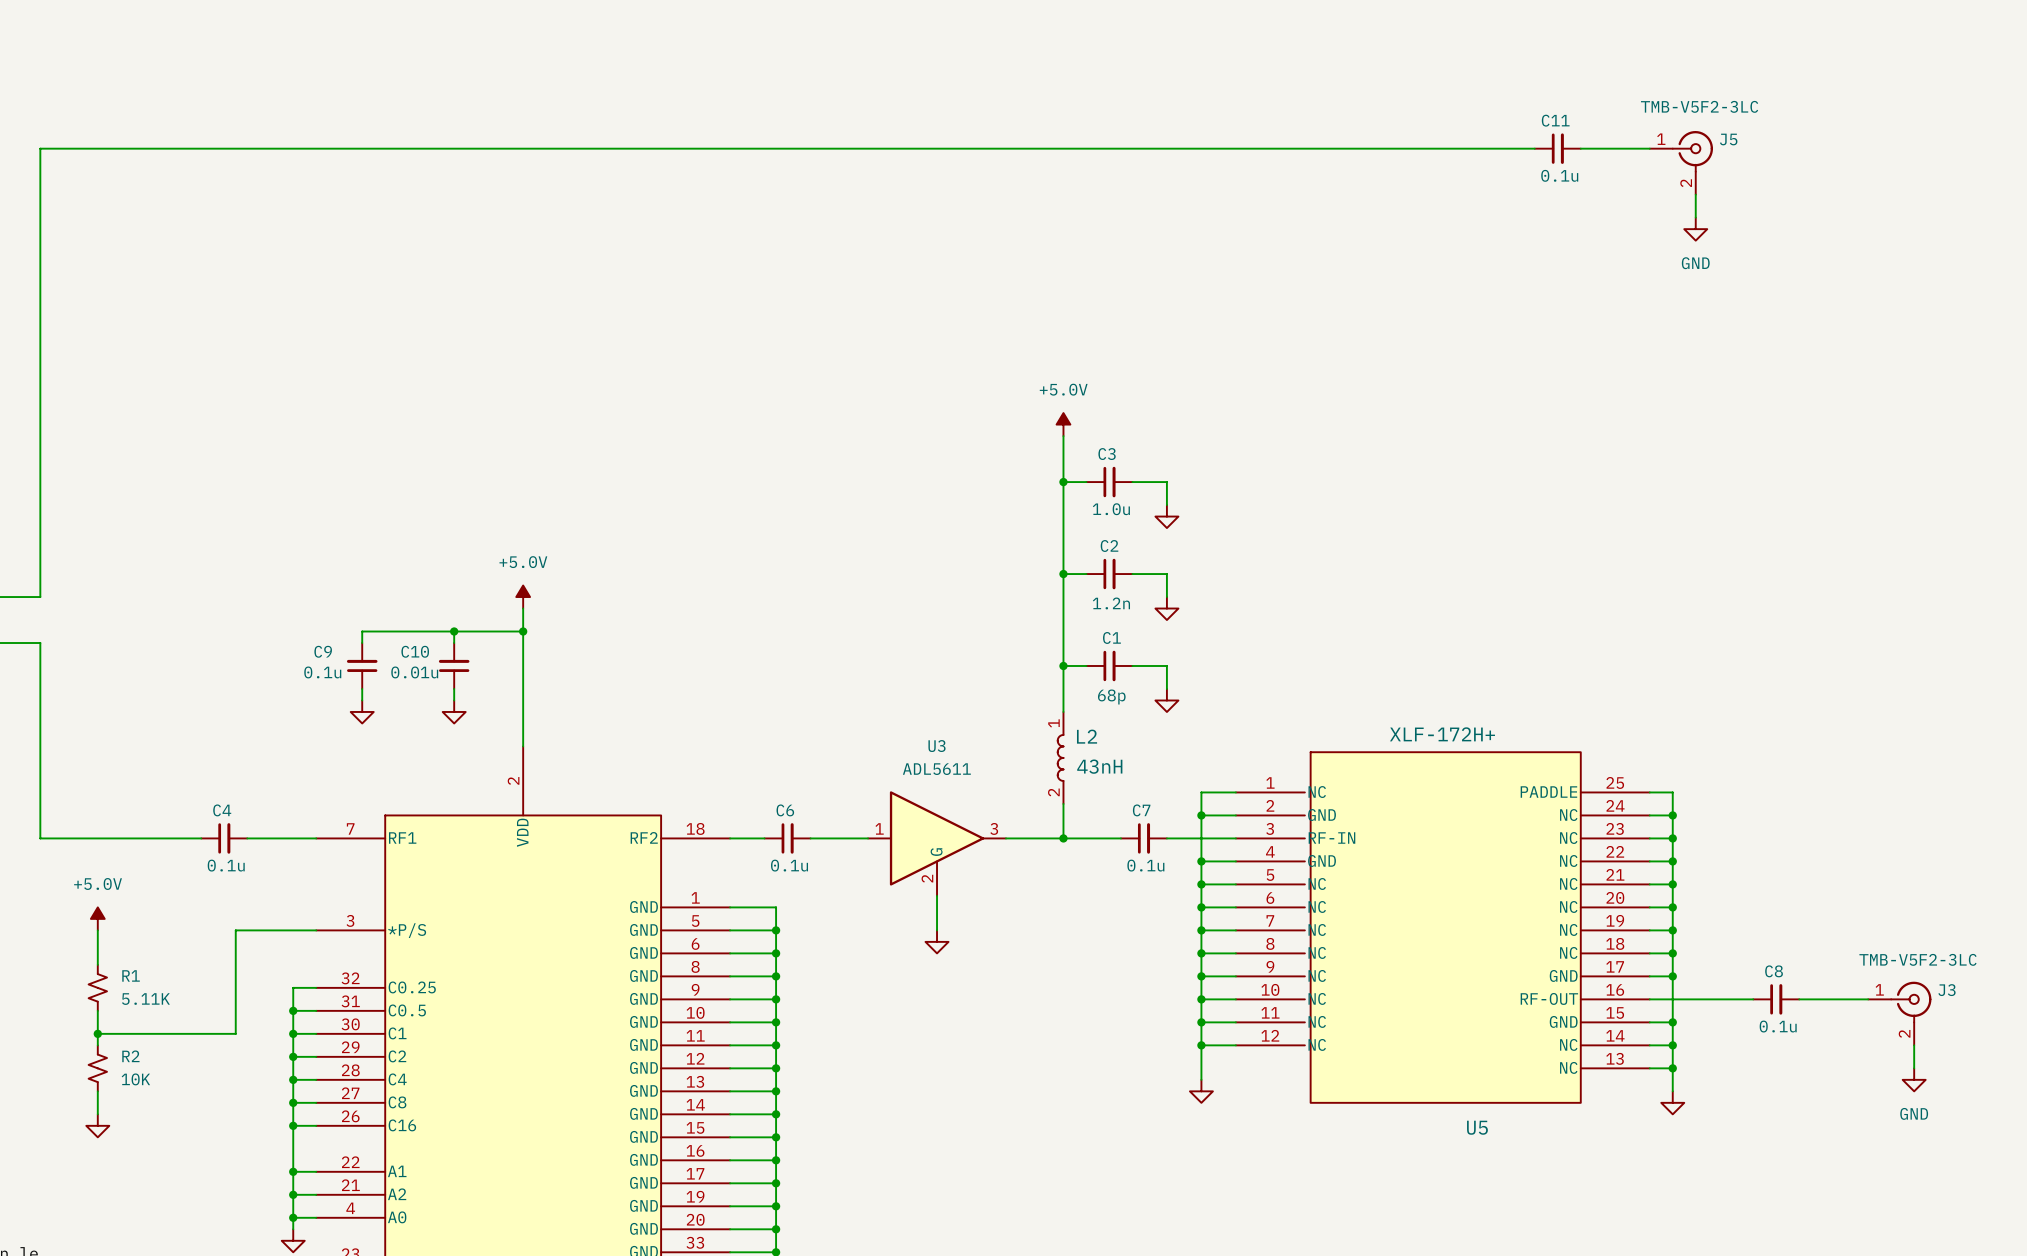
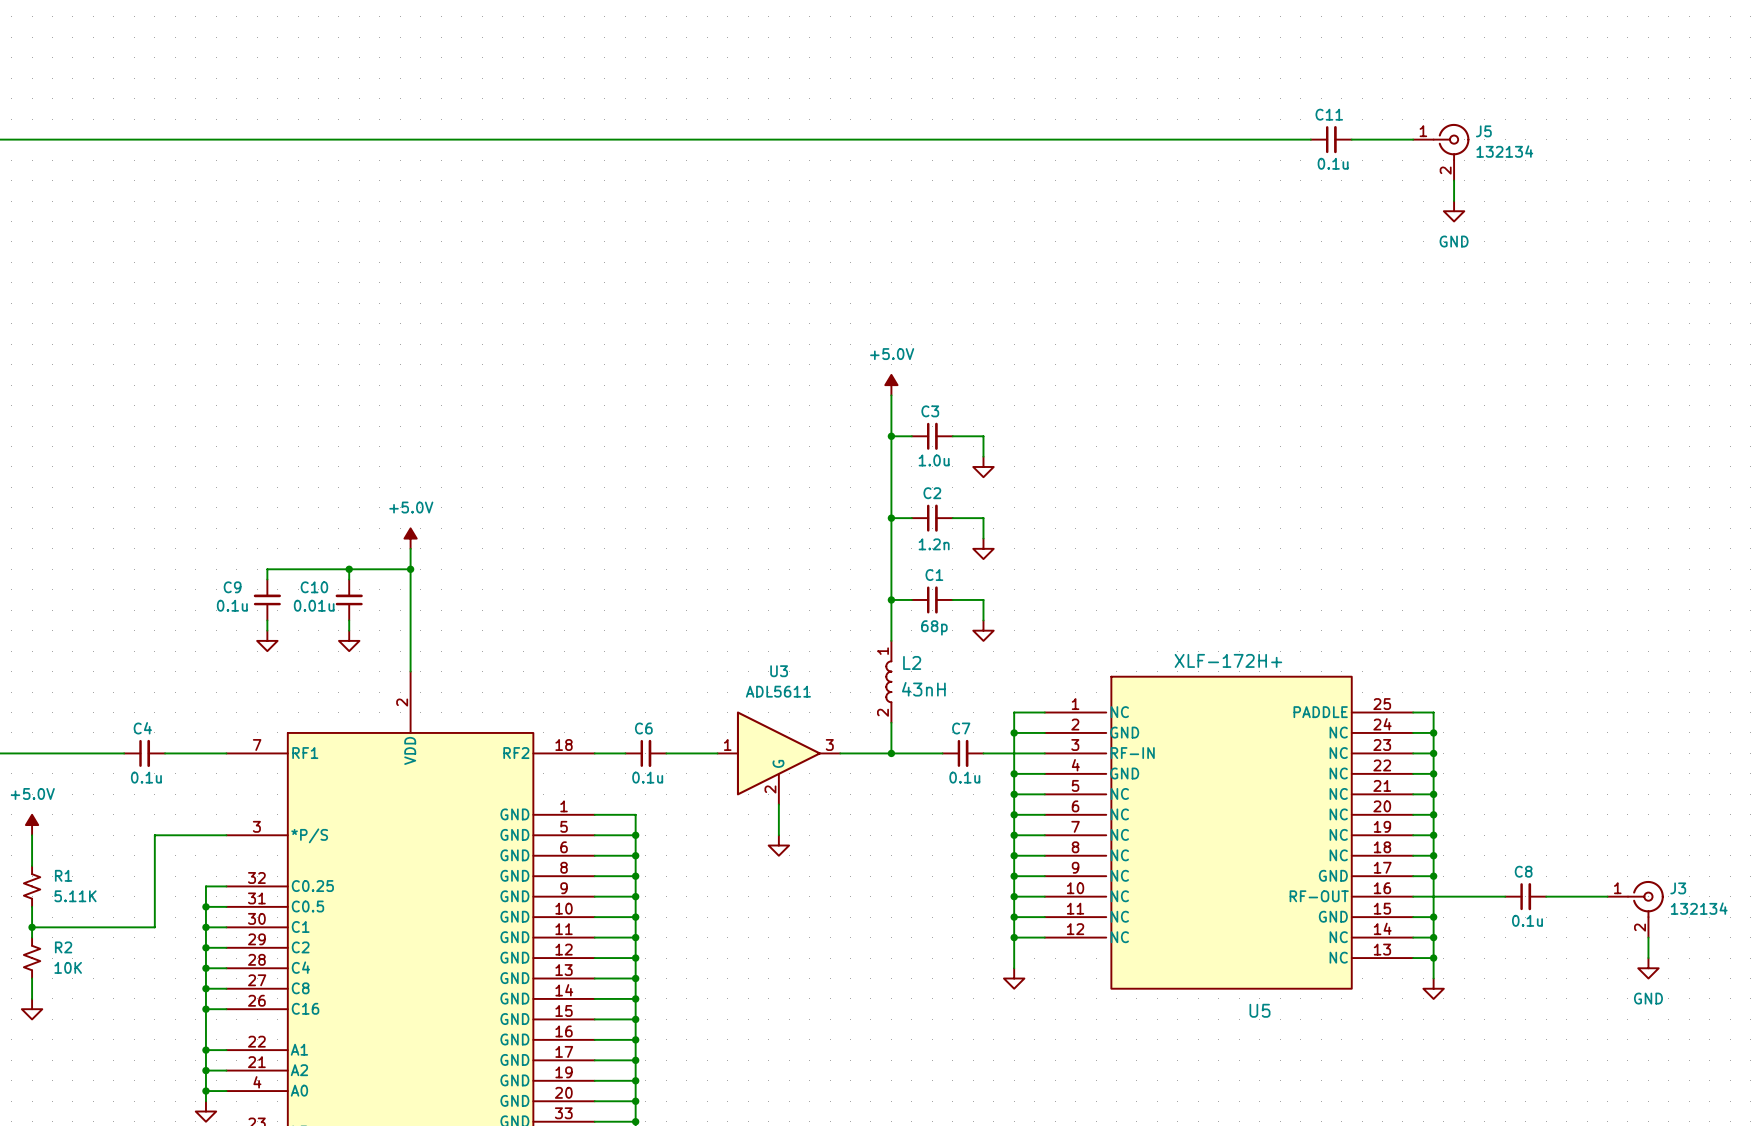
J5 value: TMB-V5F2-3LC (1699, 106) -> 132134 (1504, 151)
J3 value: TMB-V5F2-3LC (1917, 959) -> 132134 (1699, 908)

